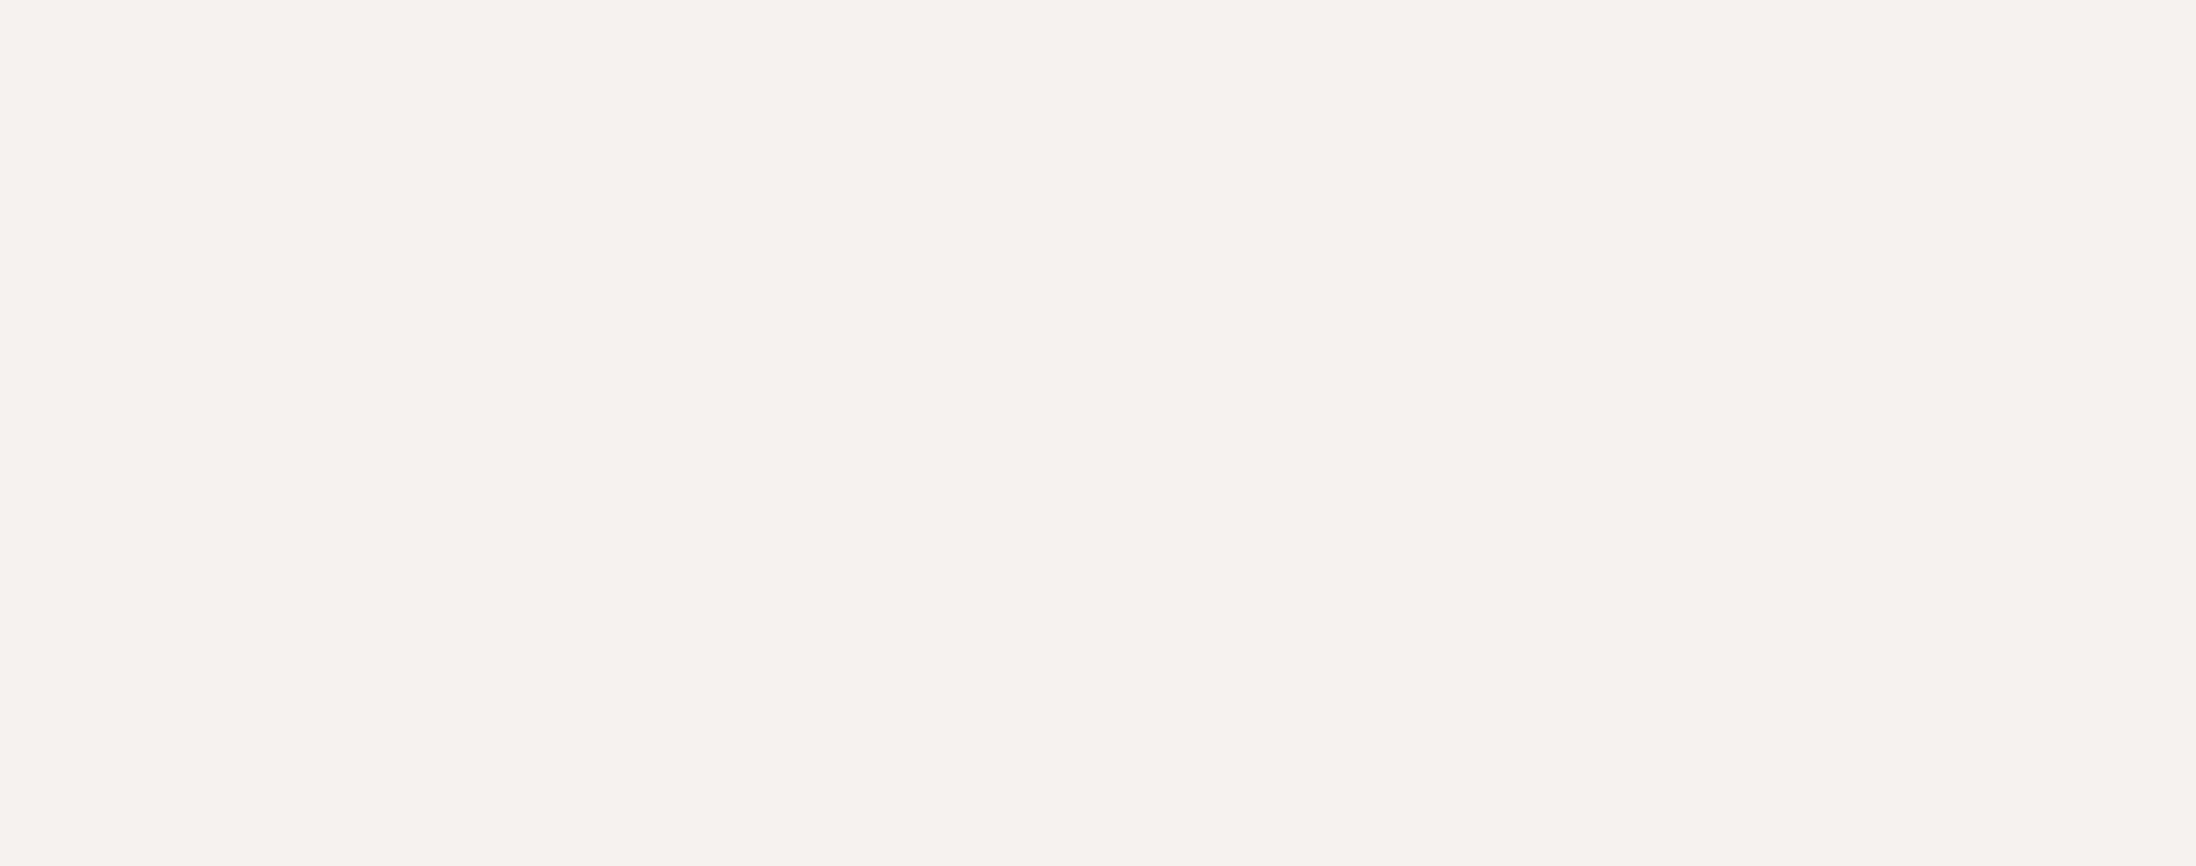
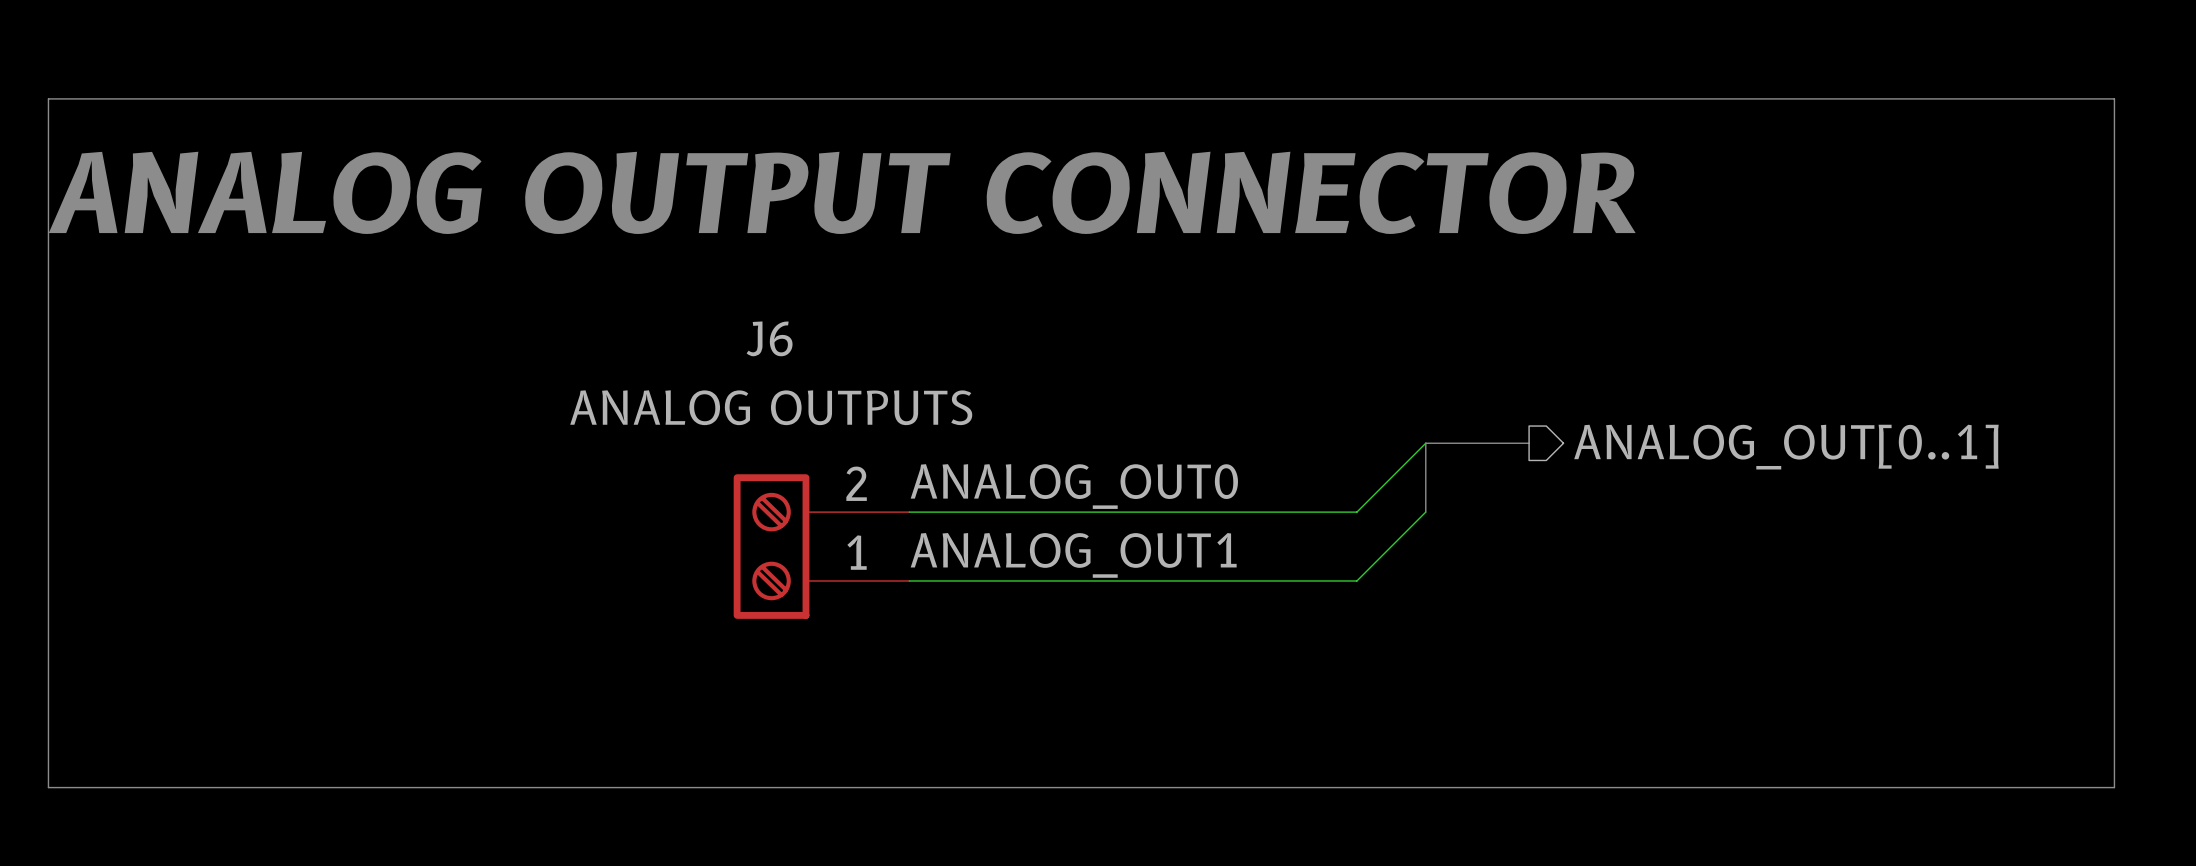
line: none -> (48, 98) (2114, 98) (2114, 787) (48, 787) (48, 98)
text: none -> ANALOG OUTPUT CONNECTOR (842, 192)
wire: none -> (1425, 443) (1356, 512) (909, 512)
bus: none -> (1529, 443) (1425, 443) (1425, 512)
hierarchical label: none -> ANALOG_OUT[0..1] (1786, 447)
label: none -> ANALOG_OUT0 (1074, 486)
wire: none -> (1425, 512) (1356, 580) (909, 580)
J6: none -> ANALOG OUTPUTS (821, 546)
label: none -> ANALOG_OUT1 (1073, 555)

